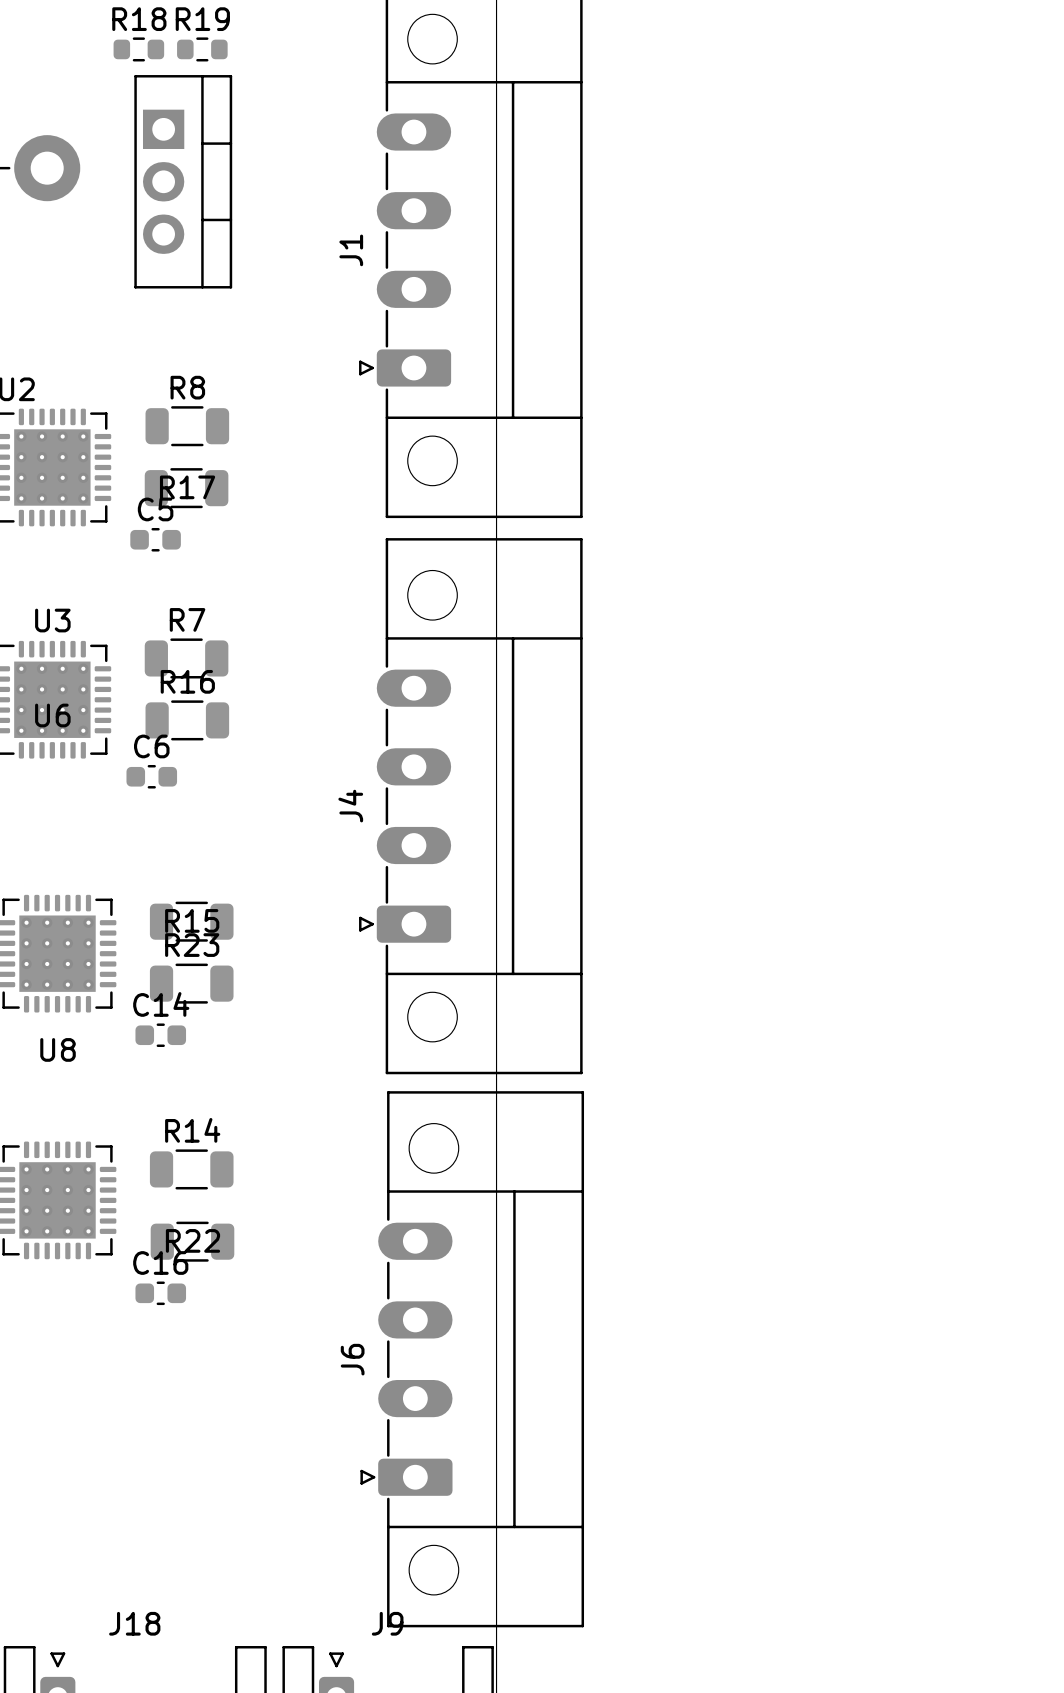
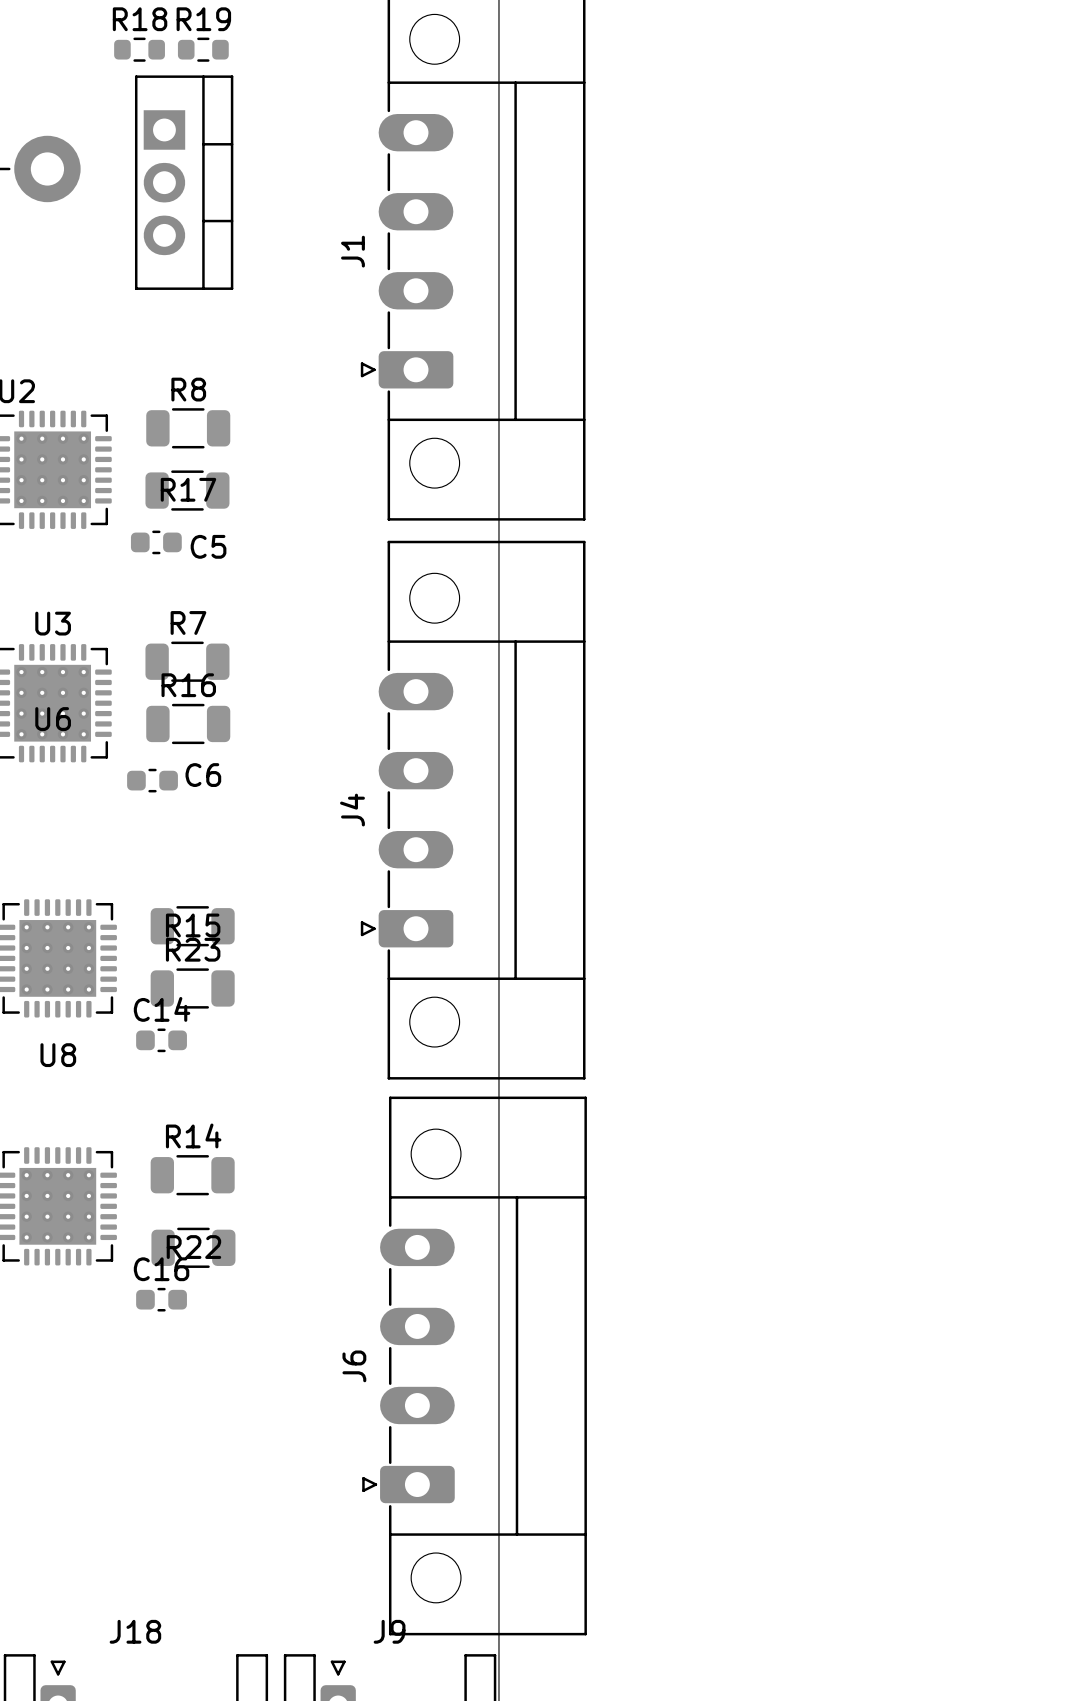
C5 name position: C5 (155, 509) -> C5 (208, 546)
C6 name position: C6 (151, 746) -> C6 (203, 775)

